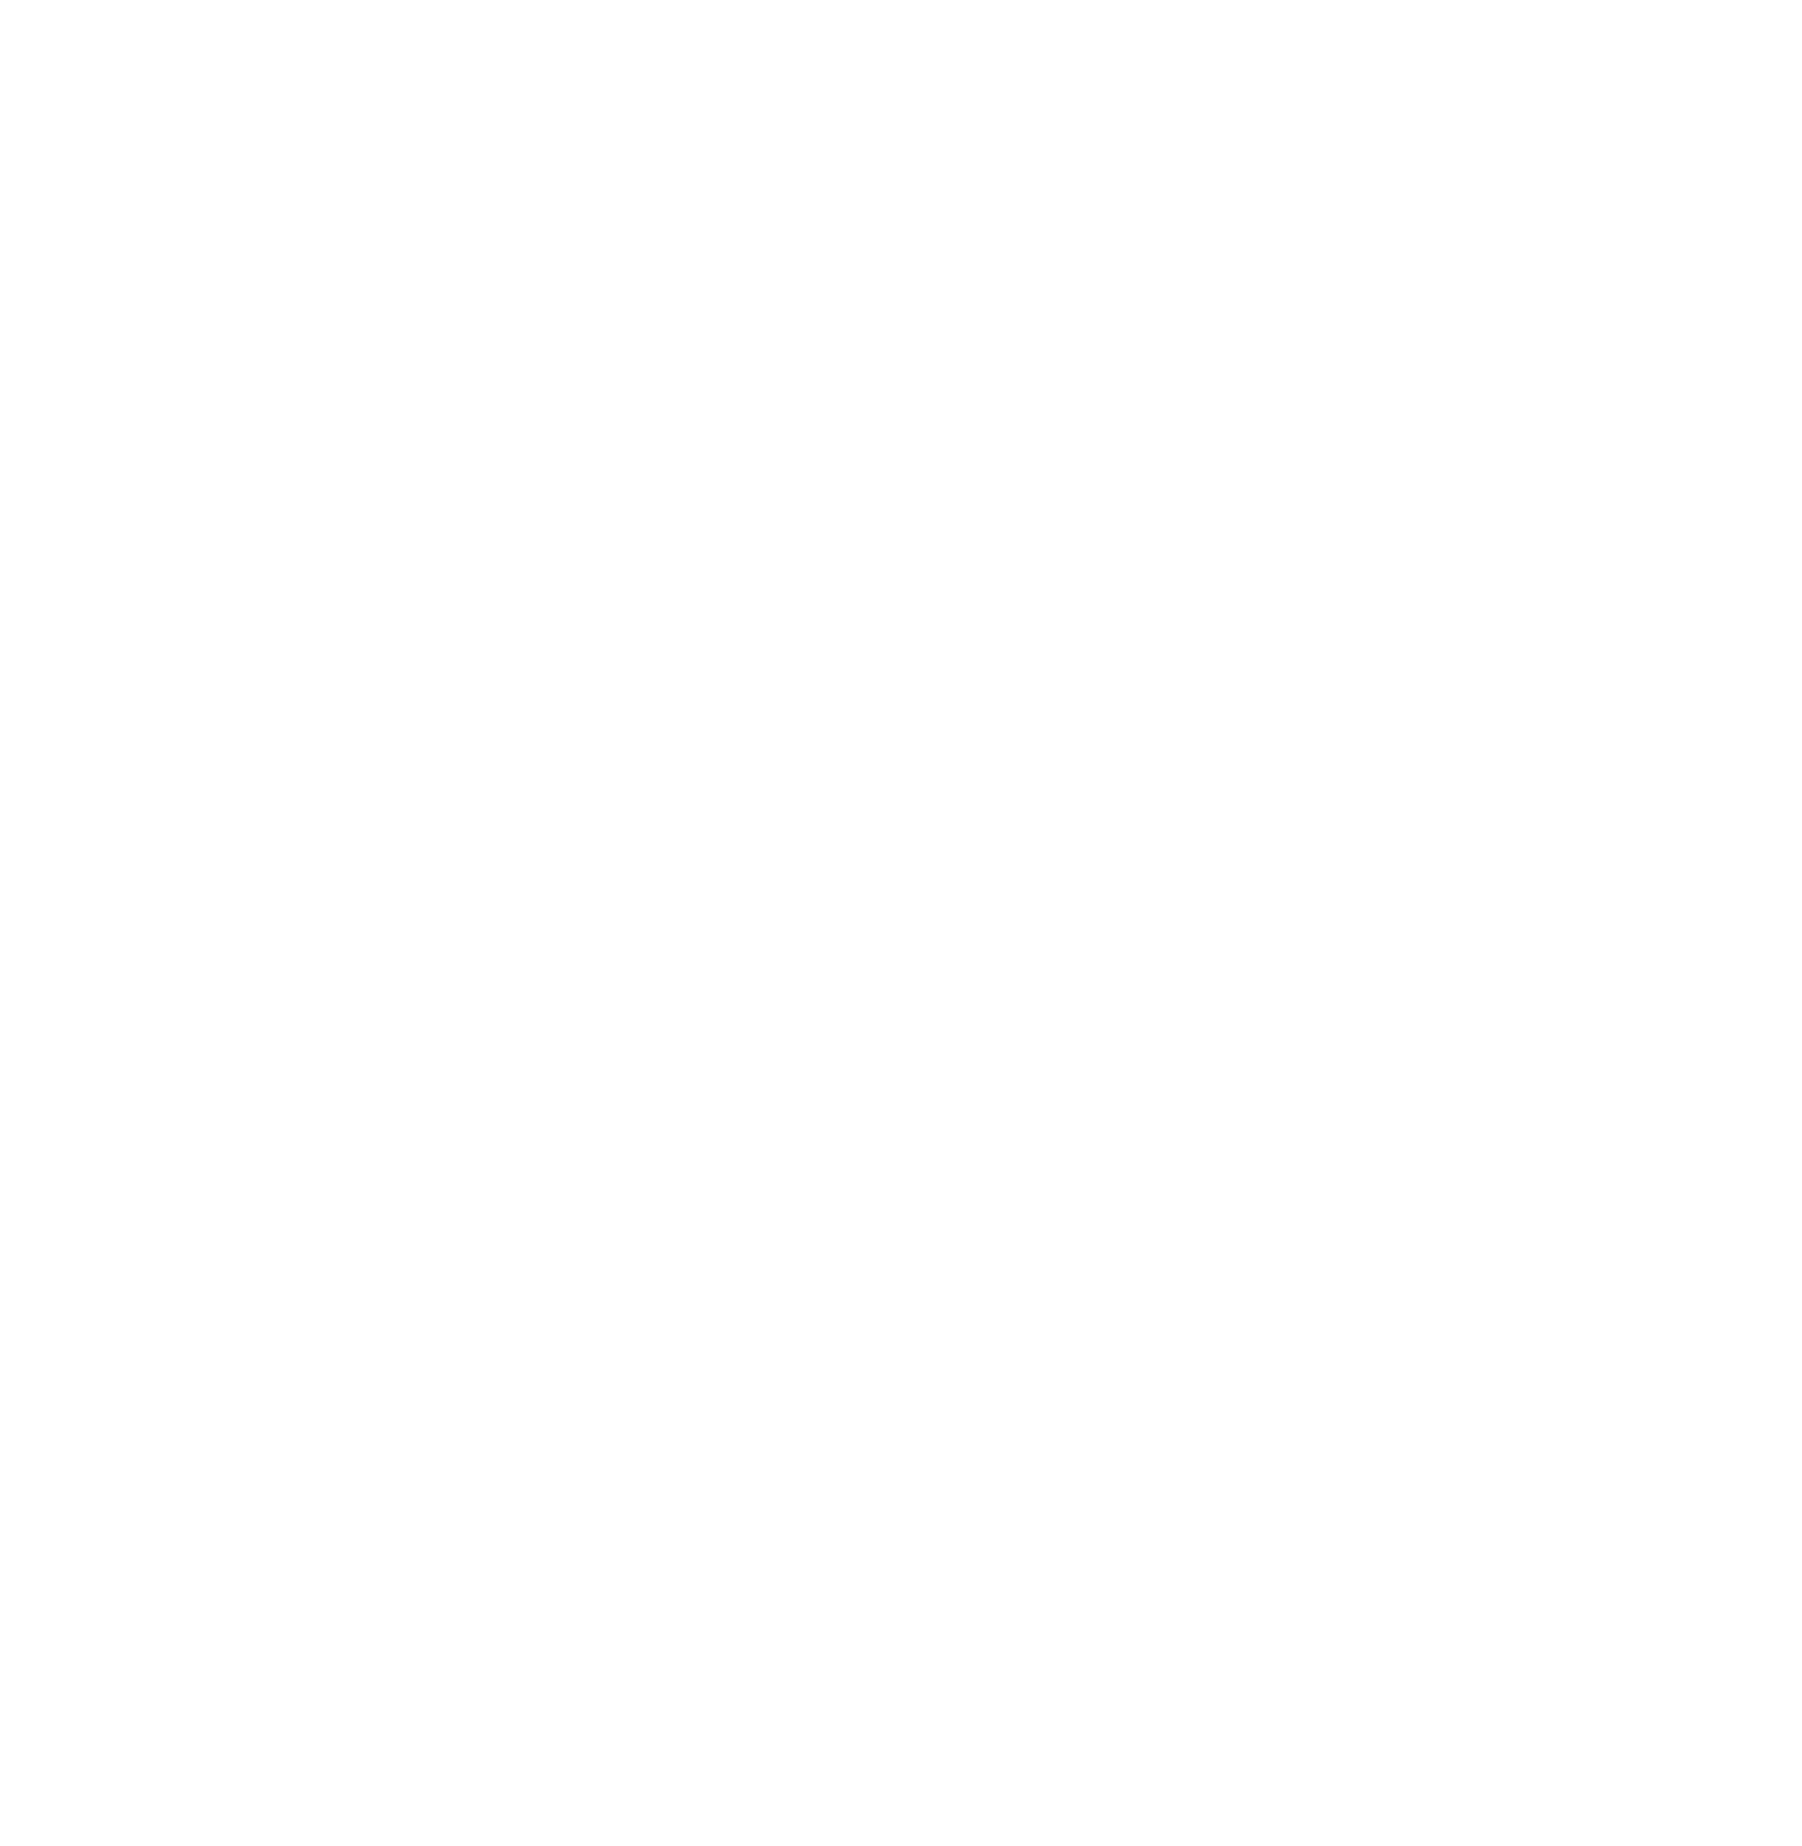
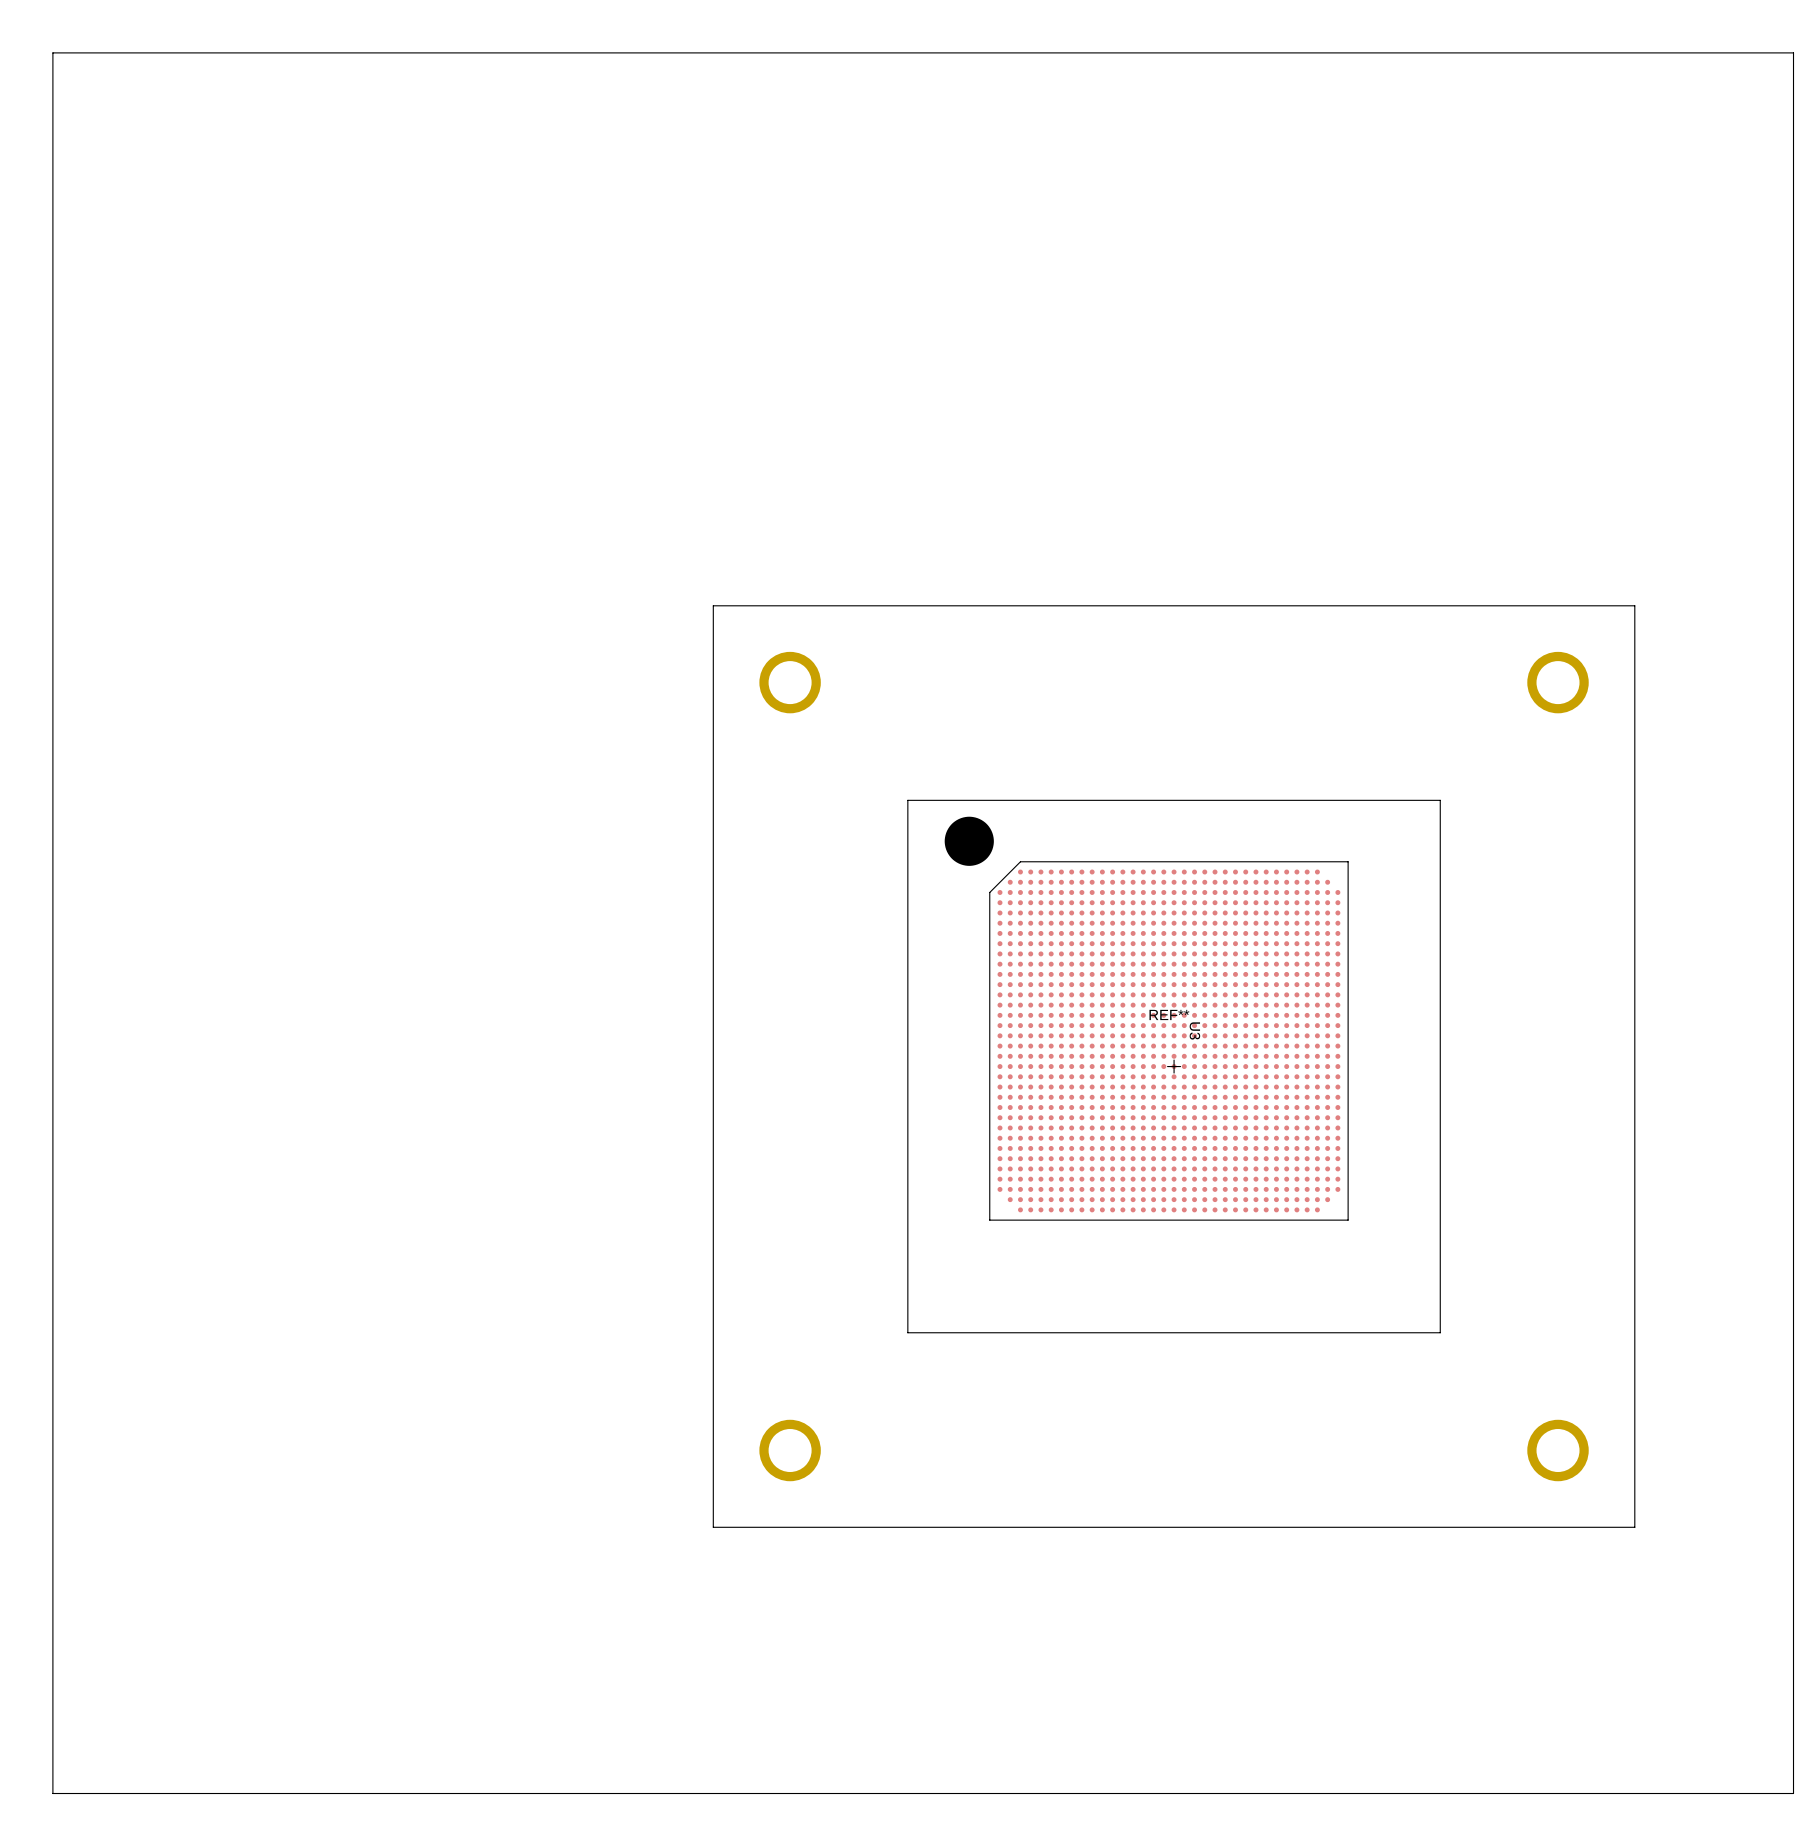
board edge: none -> (52, 52) (1793, 52) (1793, 1793) (52, 1793) (52, 52)
U3: none -> (1146, 1018)
REF**: none -> (1174, 1066)

